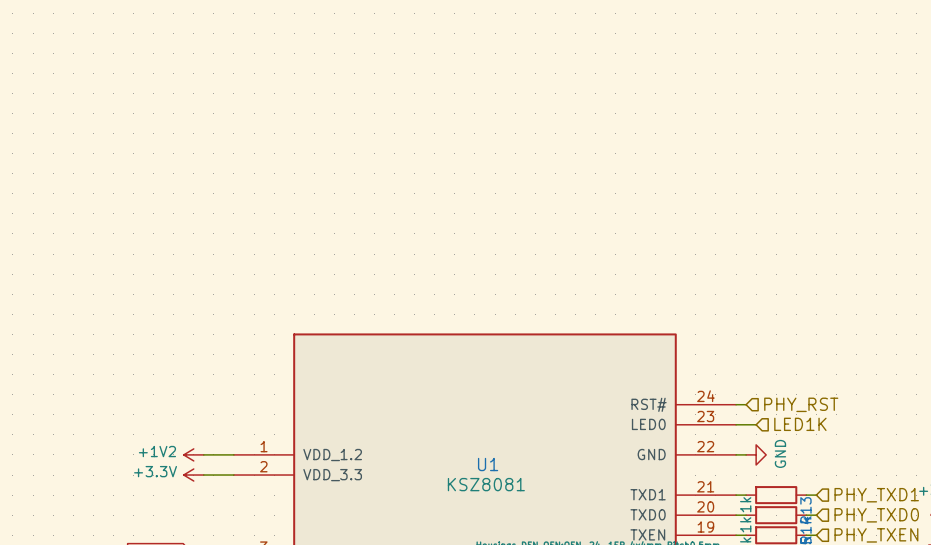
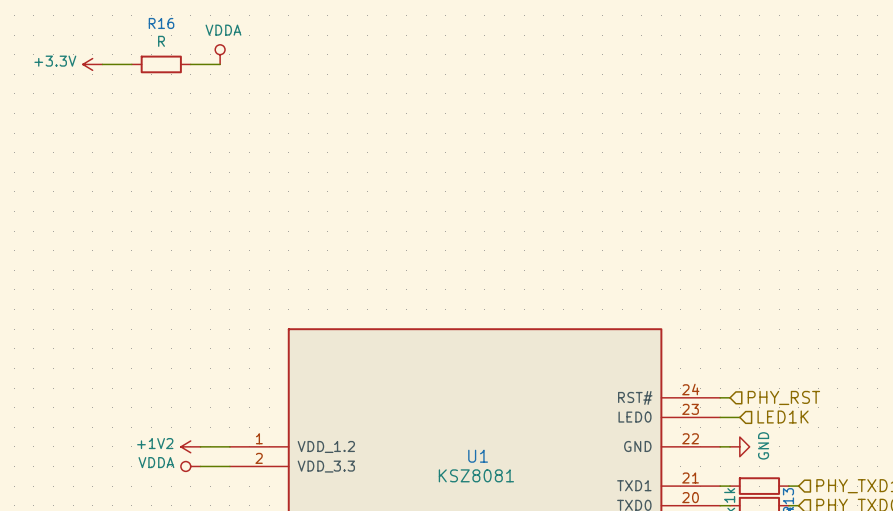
power symbol: none -> VDDA (220, 54)
power symbol: none -> +3.3V (92, 64)
wire: none -> (102, 64) (131, 64)
R16: none -> R (161, 64)
wire: none -> (190, 64) (220, 64)
power symbol: +3.3V (193, 475) -> VDDA (190, 466)

